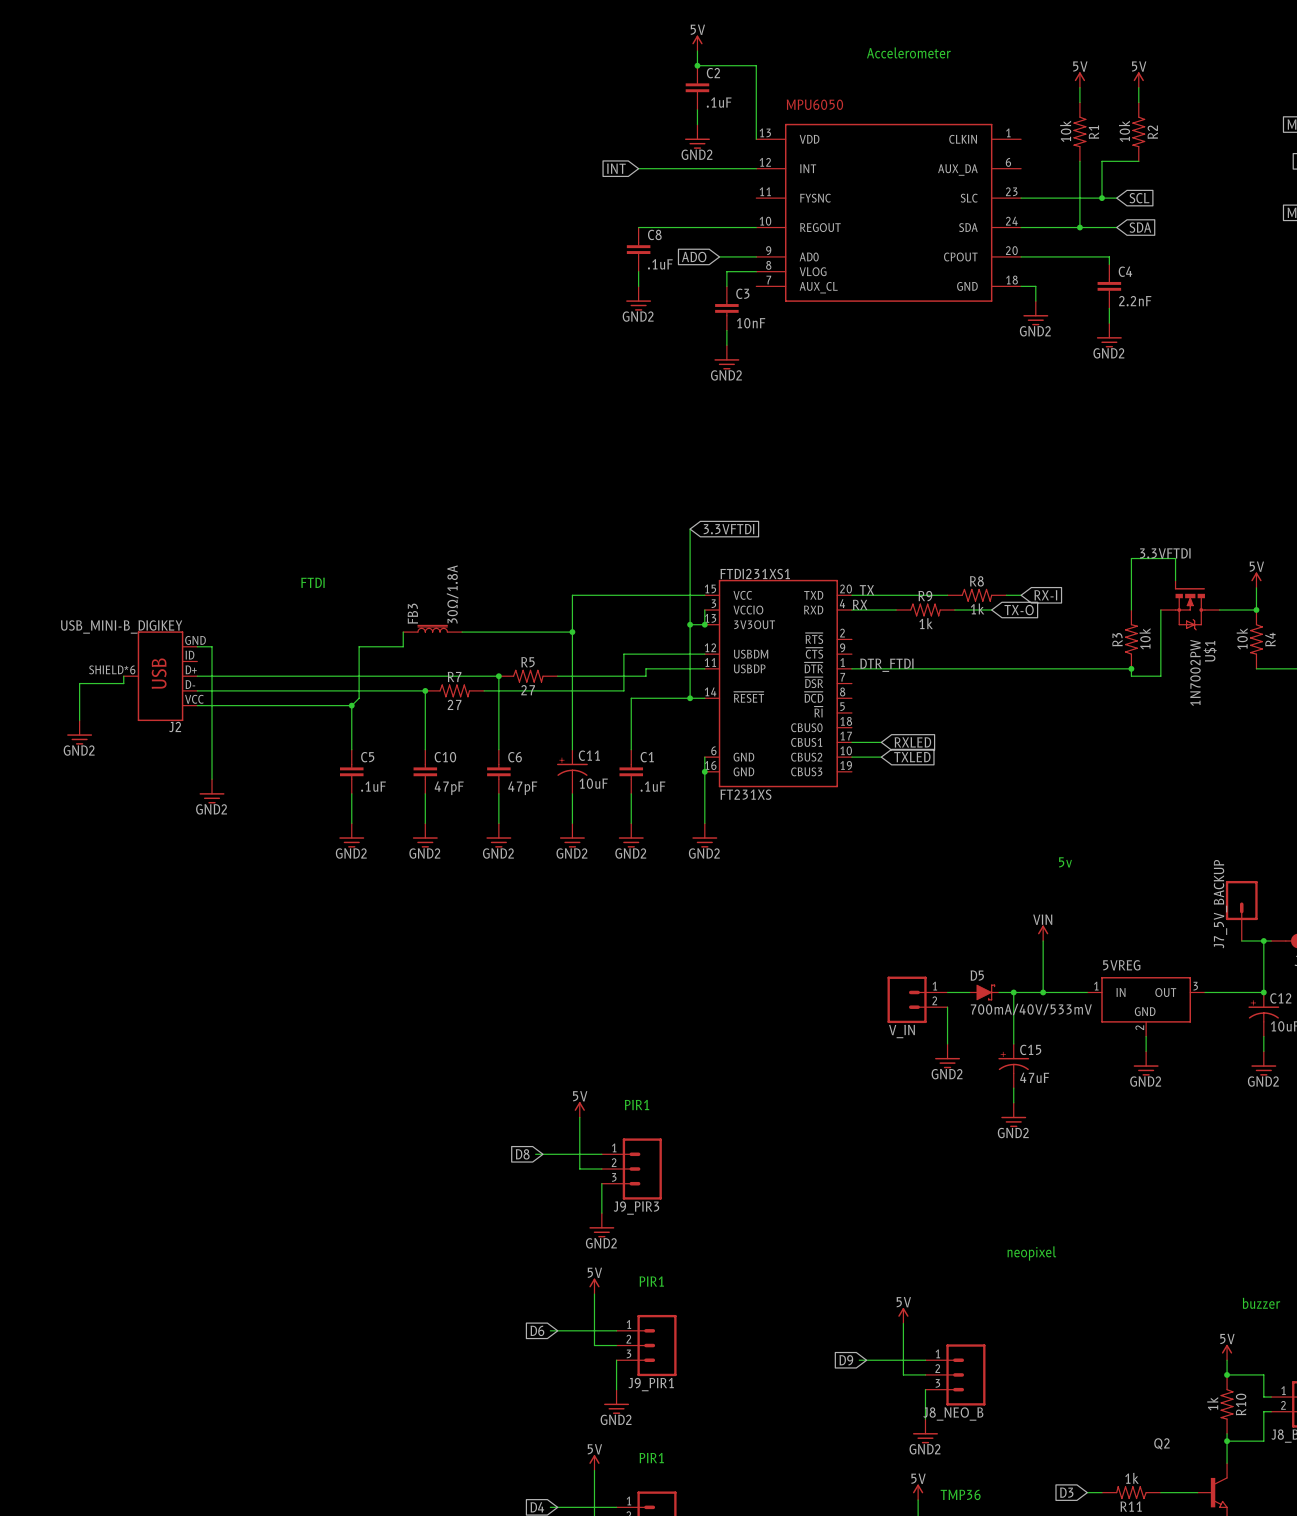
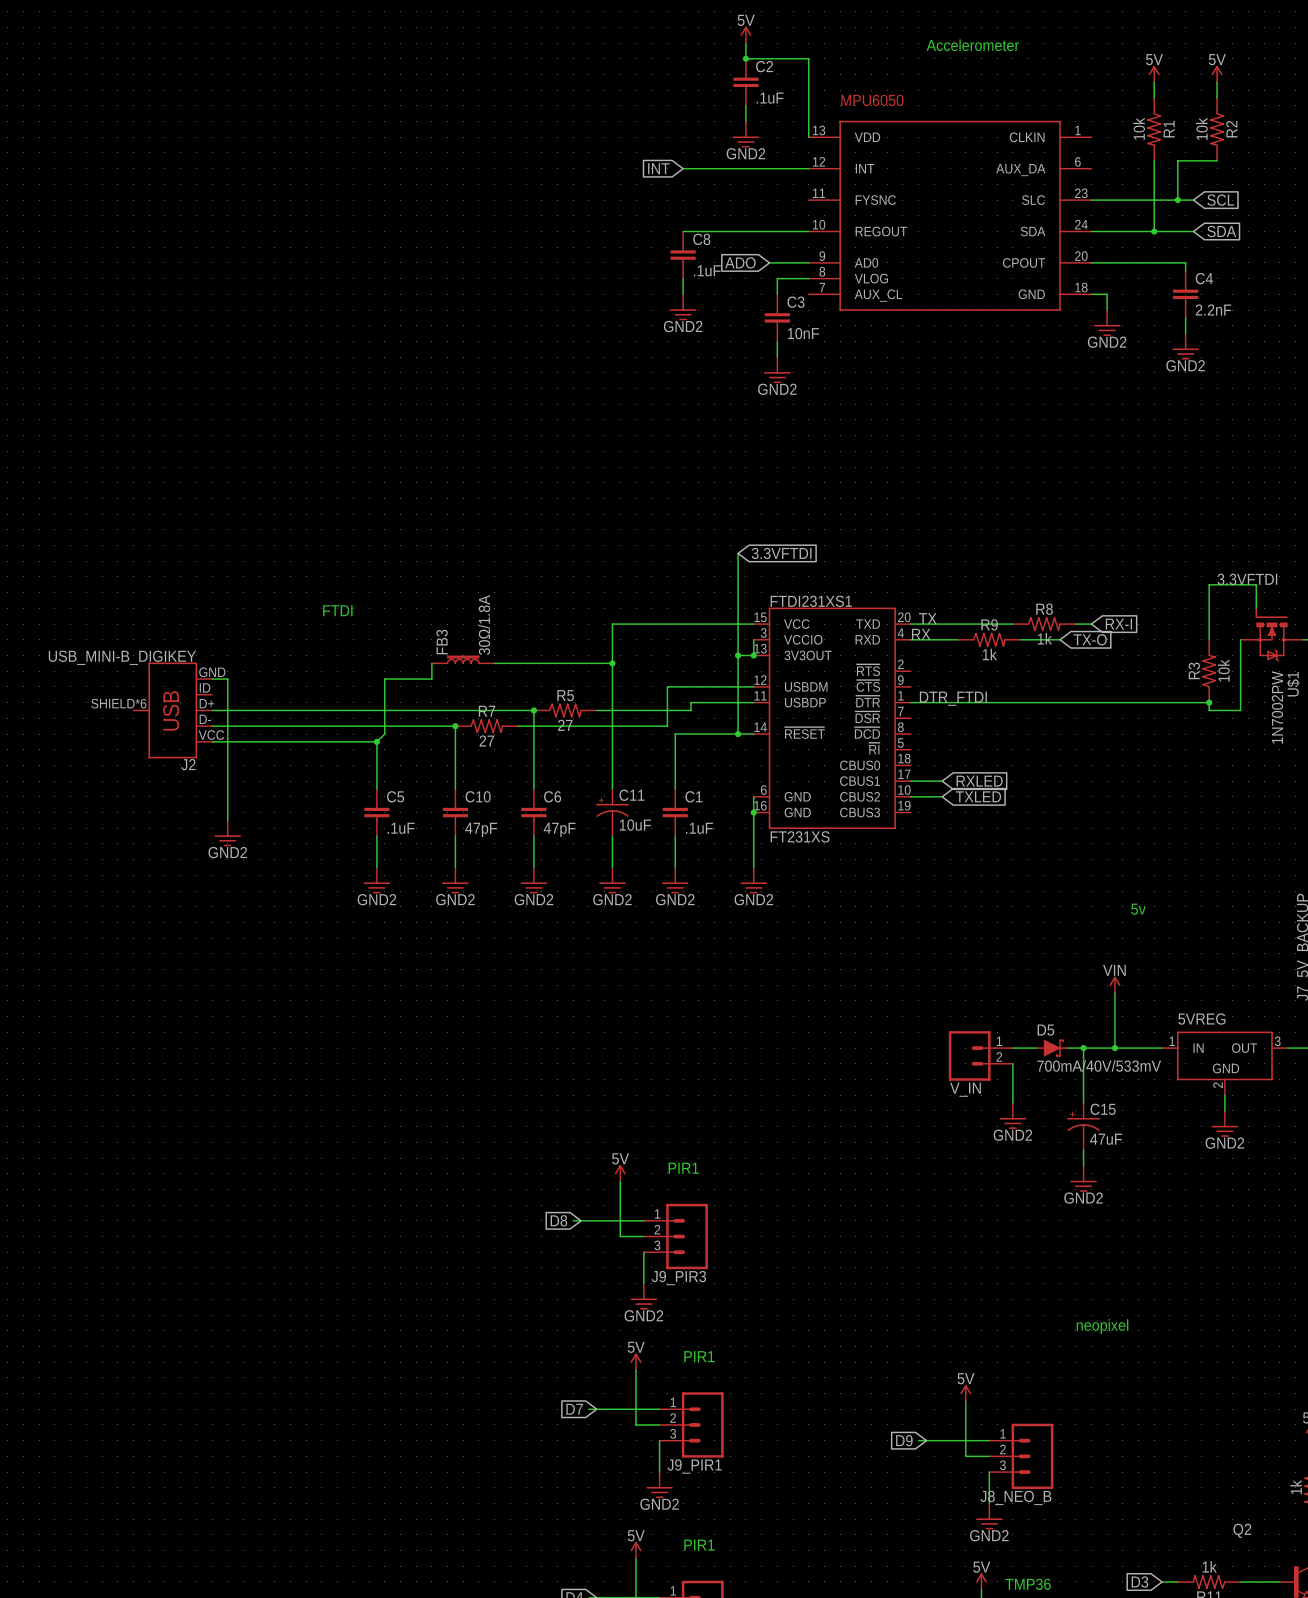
wire: (123, 676) (123, 683) (79, 683) (79, 720) -> none
power symbol: GND2 (79, 732) -> none
global label: D6 (537, 1330) -> D7 (574, 1409)

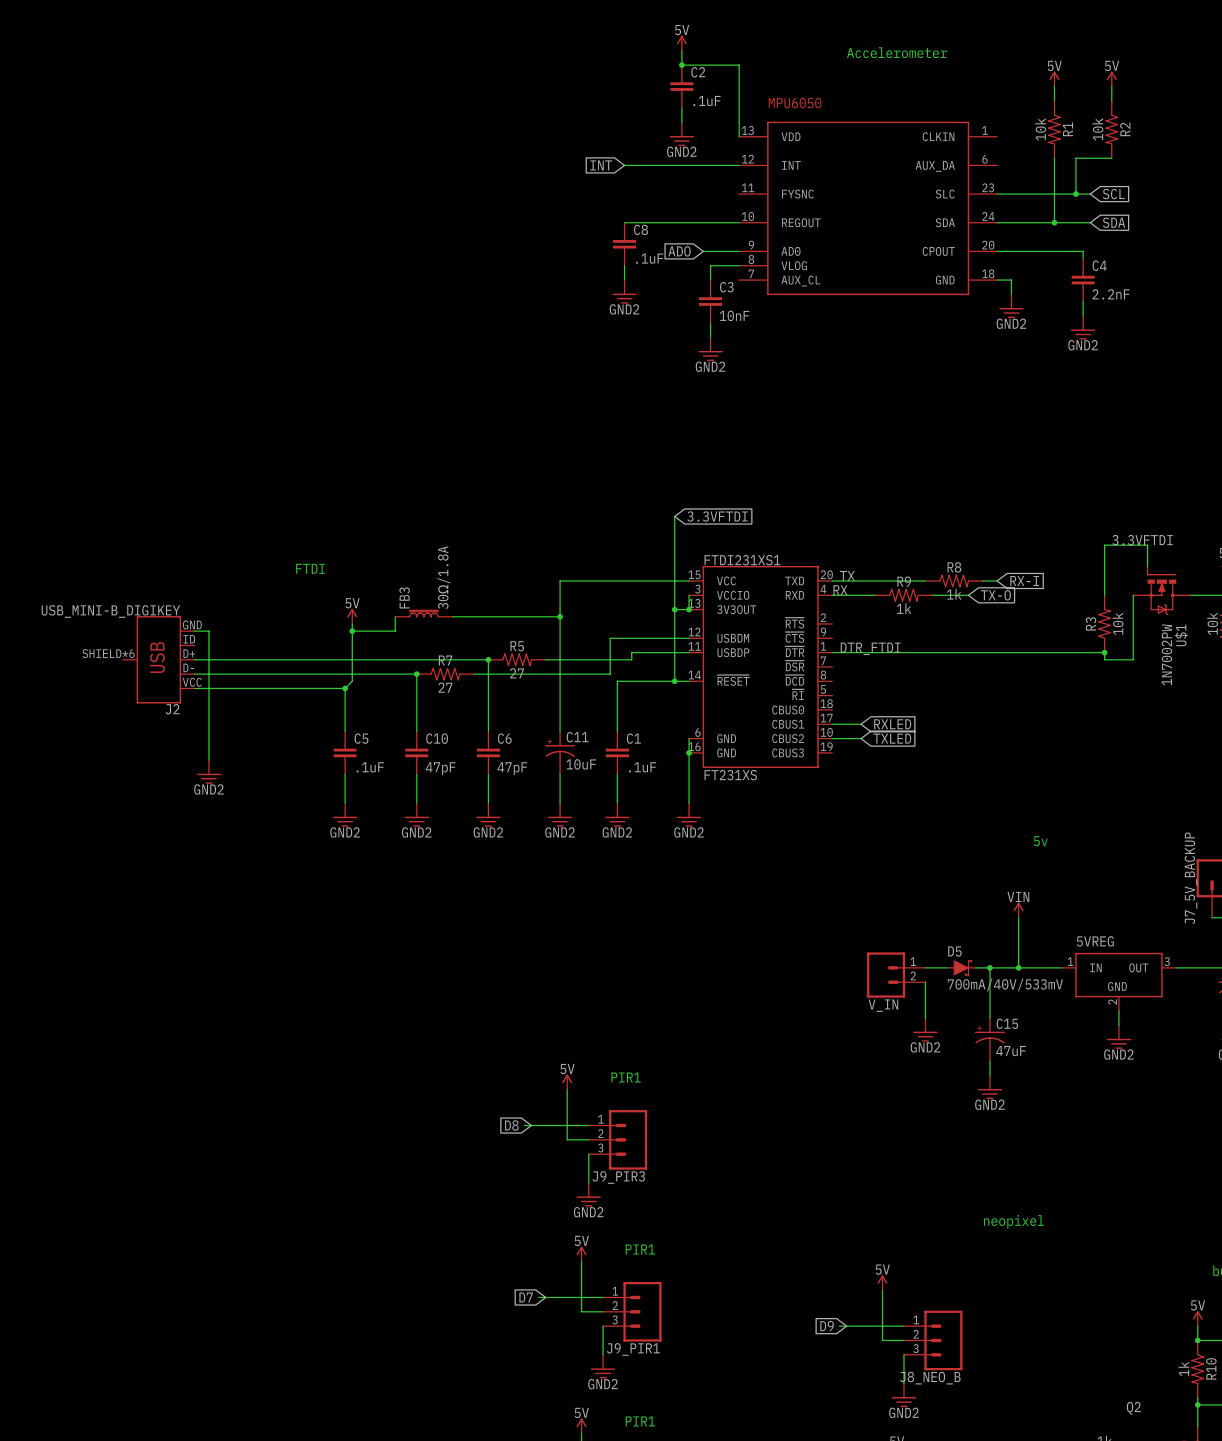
power symbol: none -> 5V (352, 616)
wire: none -> (352, 623) (352, 631)
junction: none -> (352, 631)

